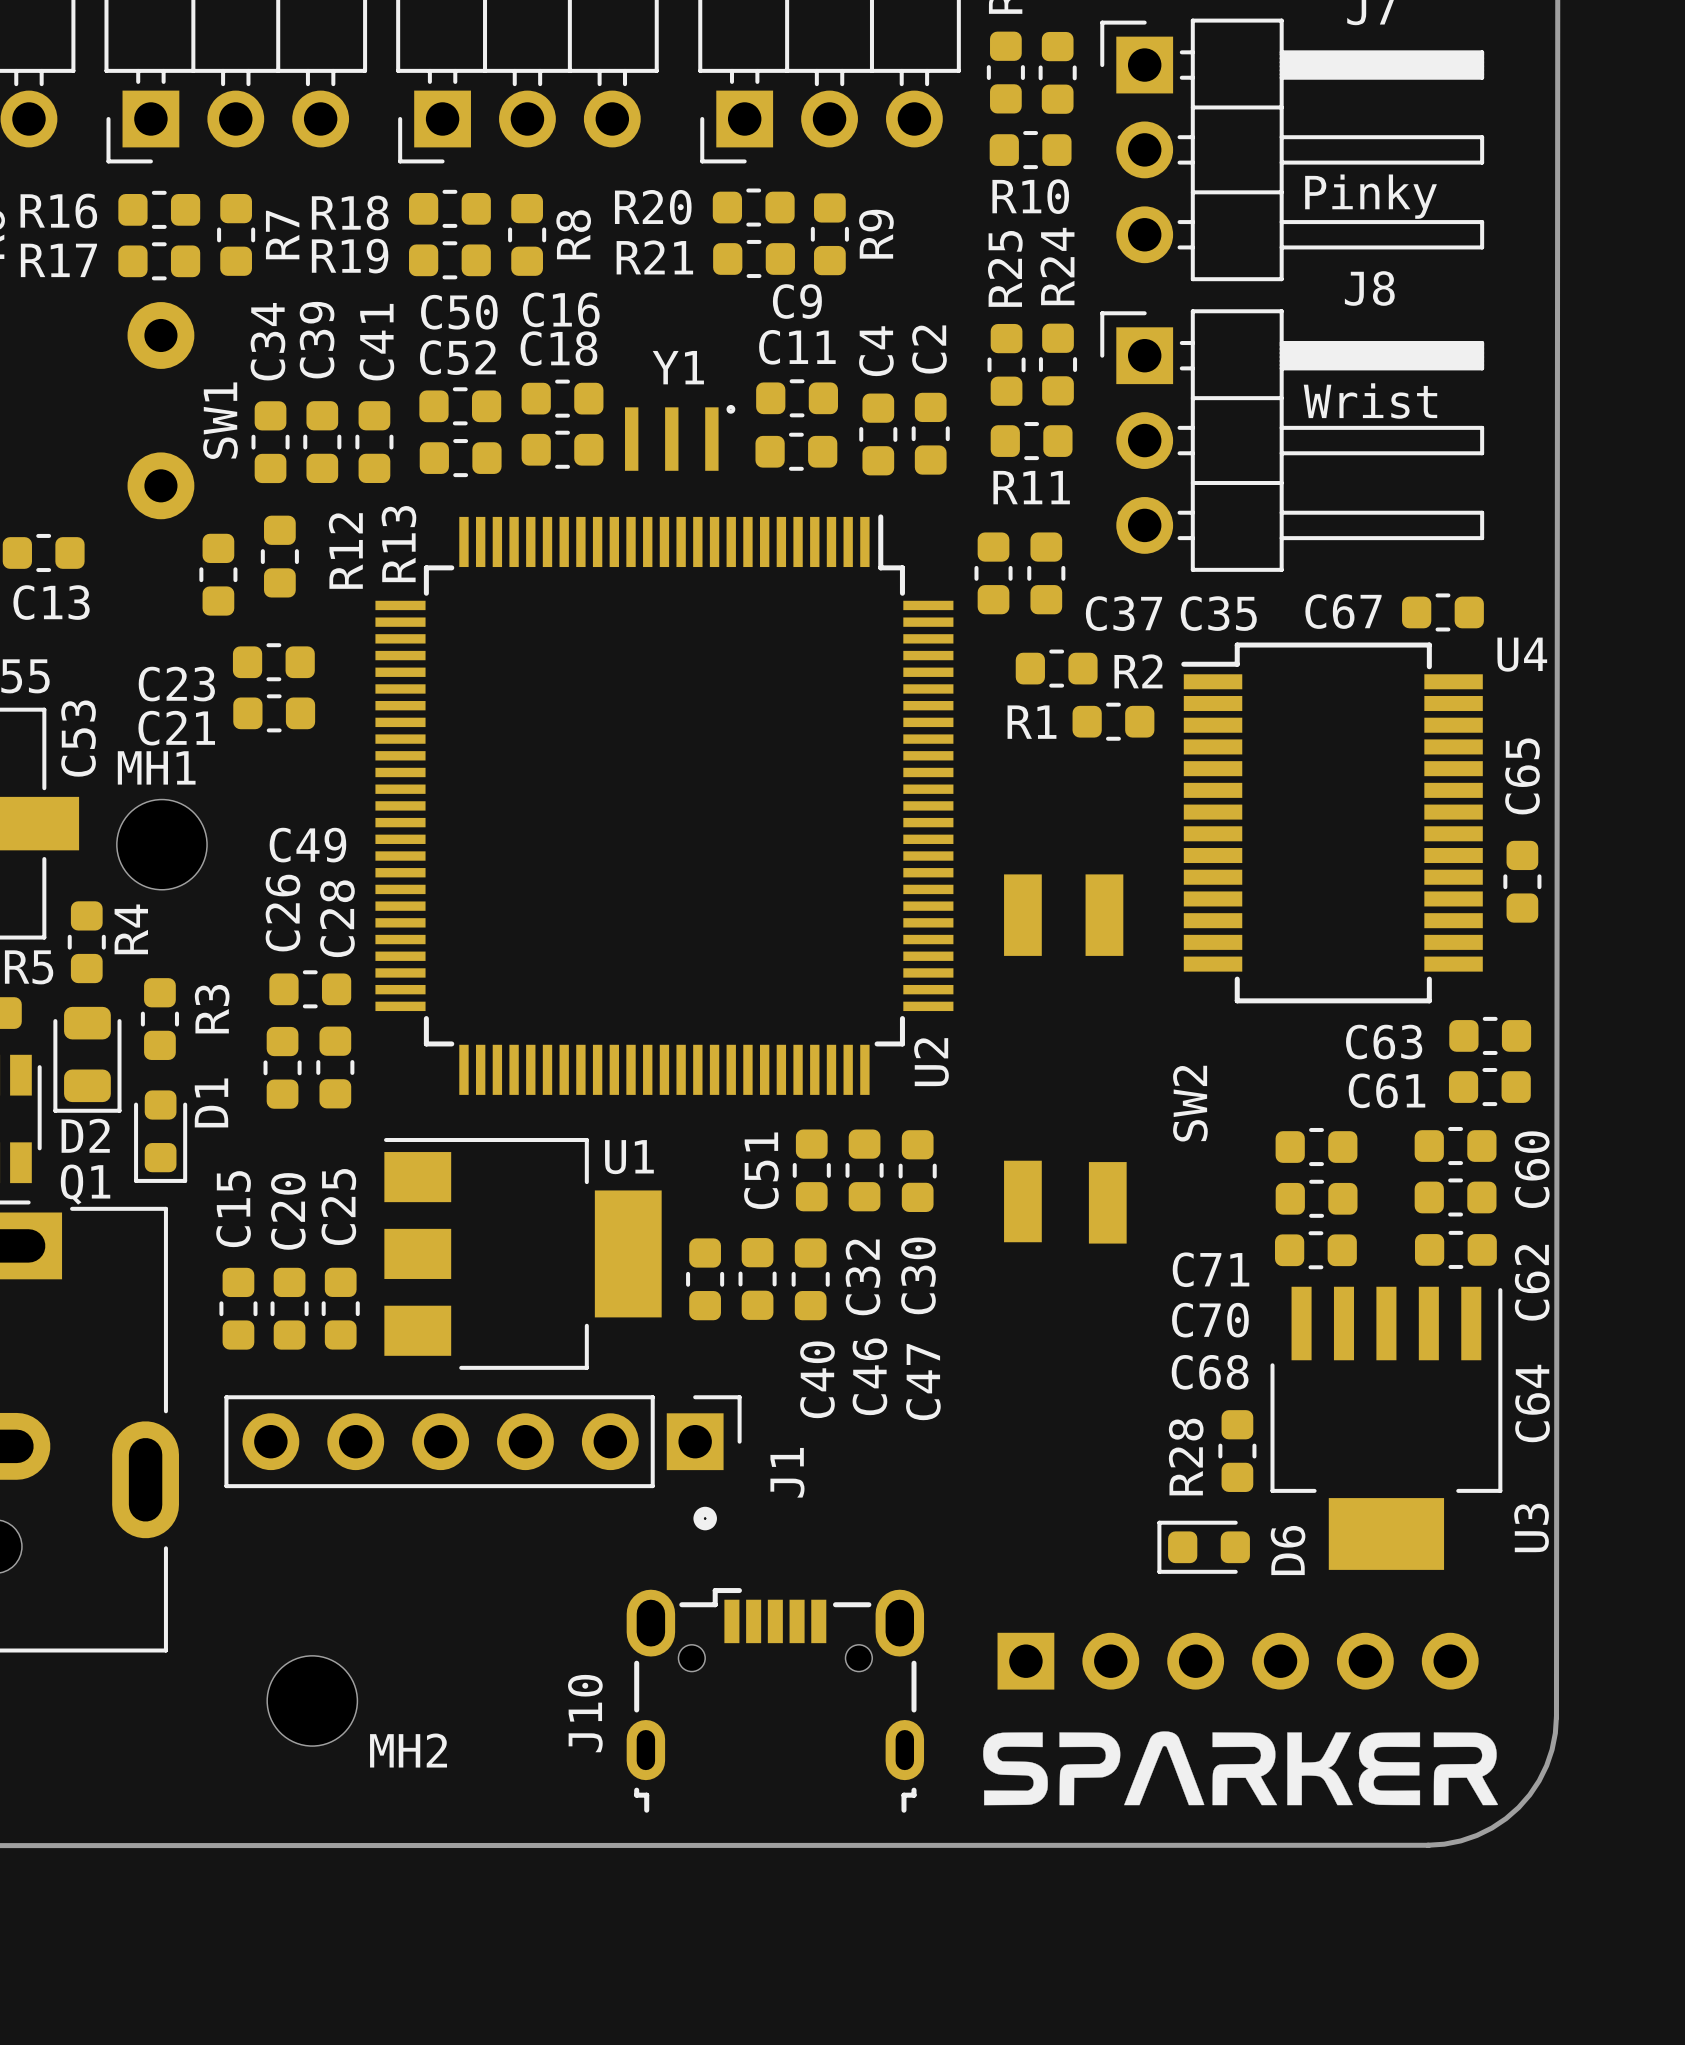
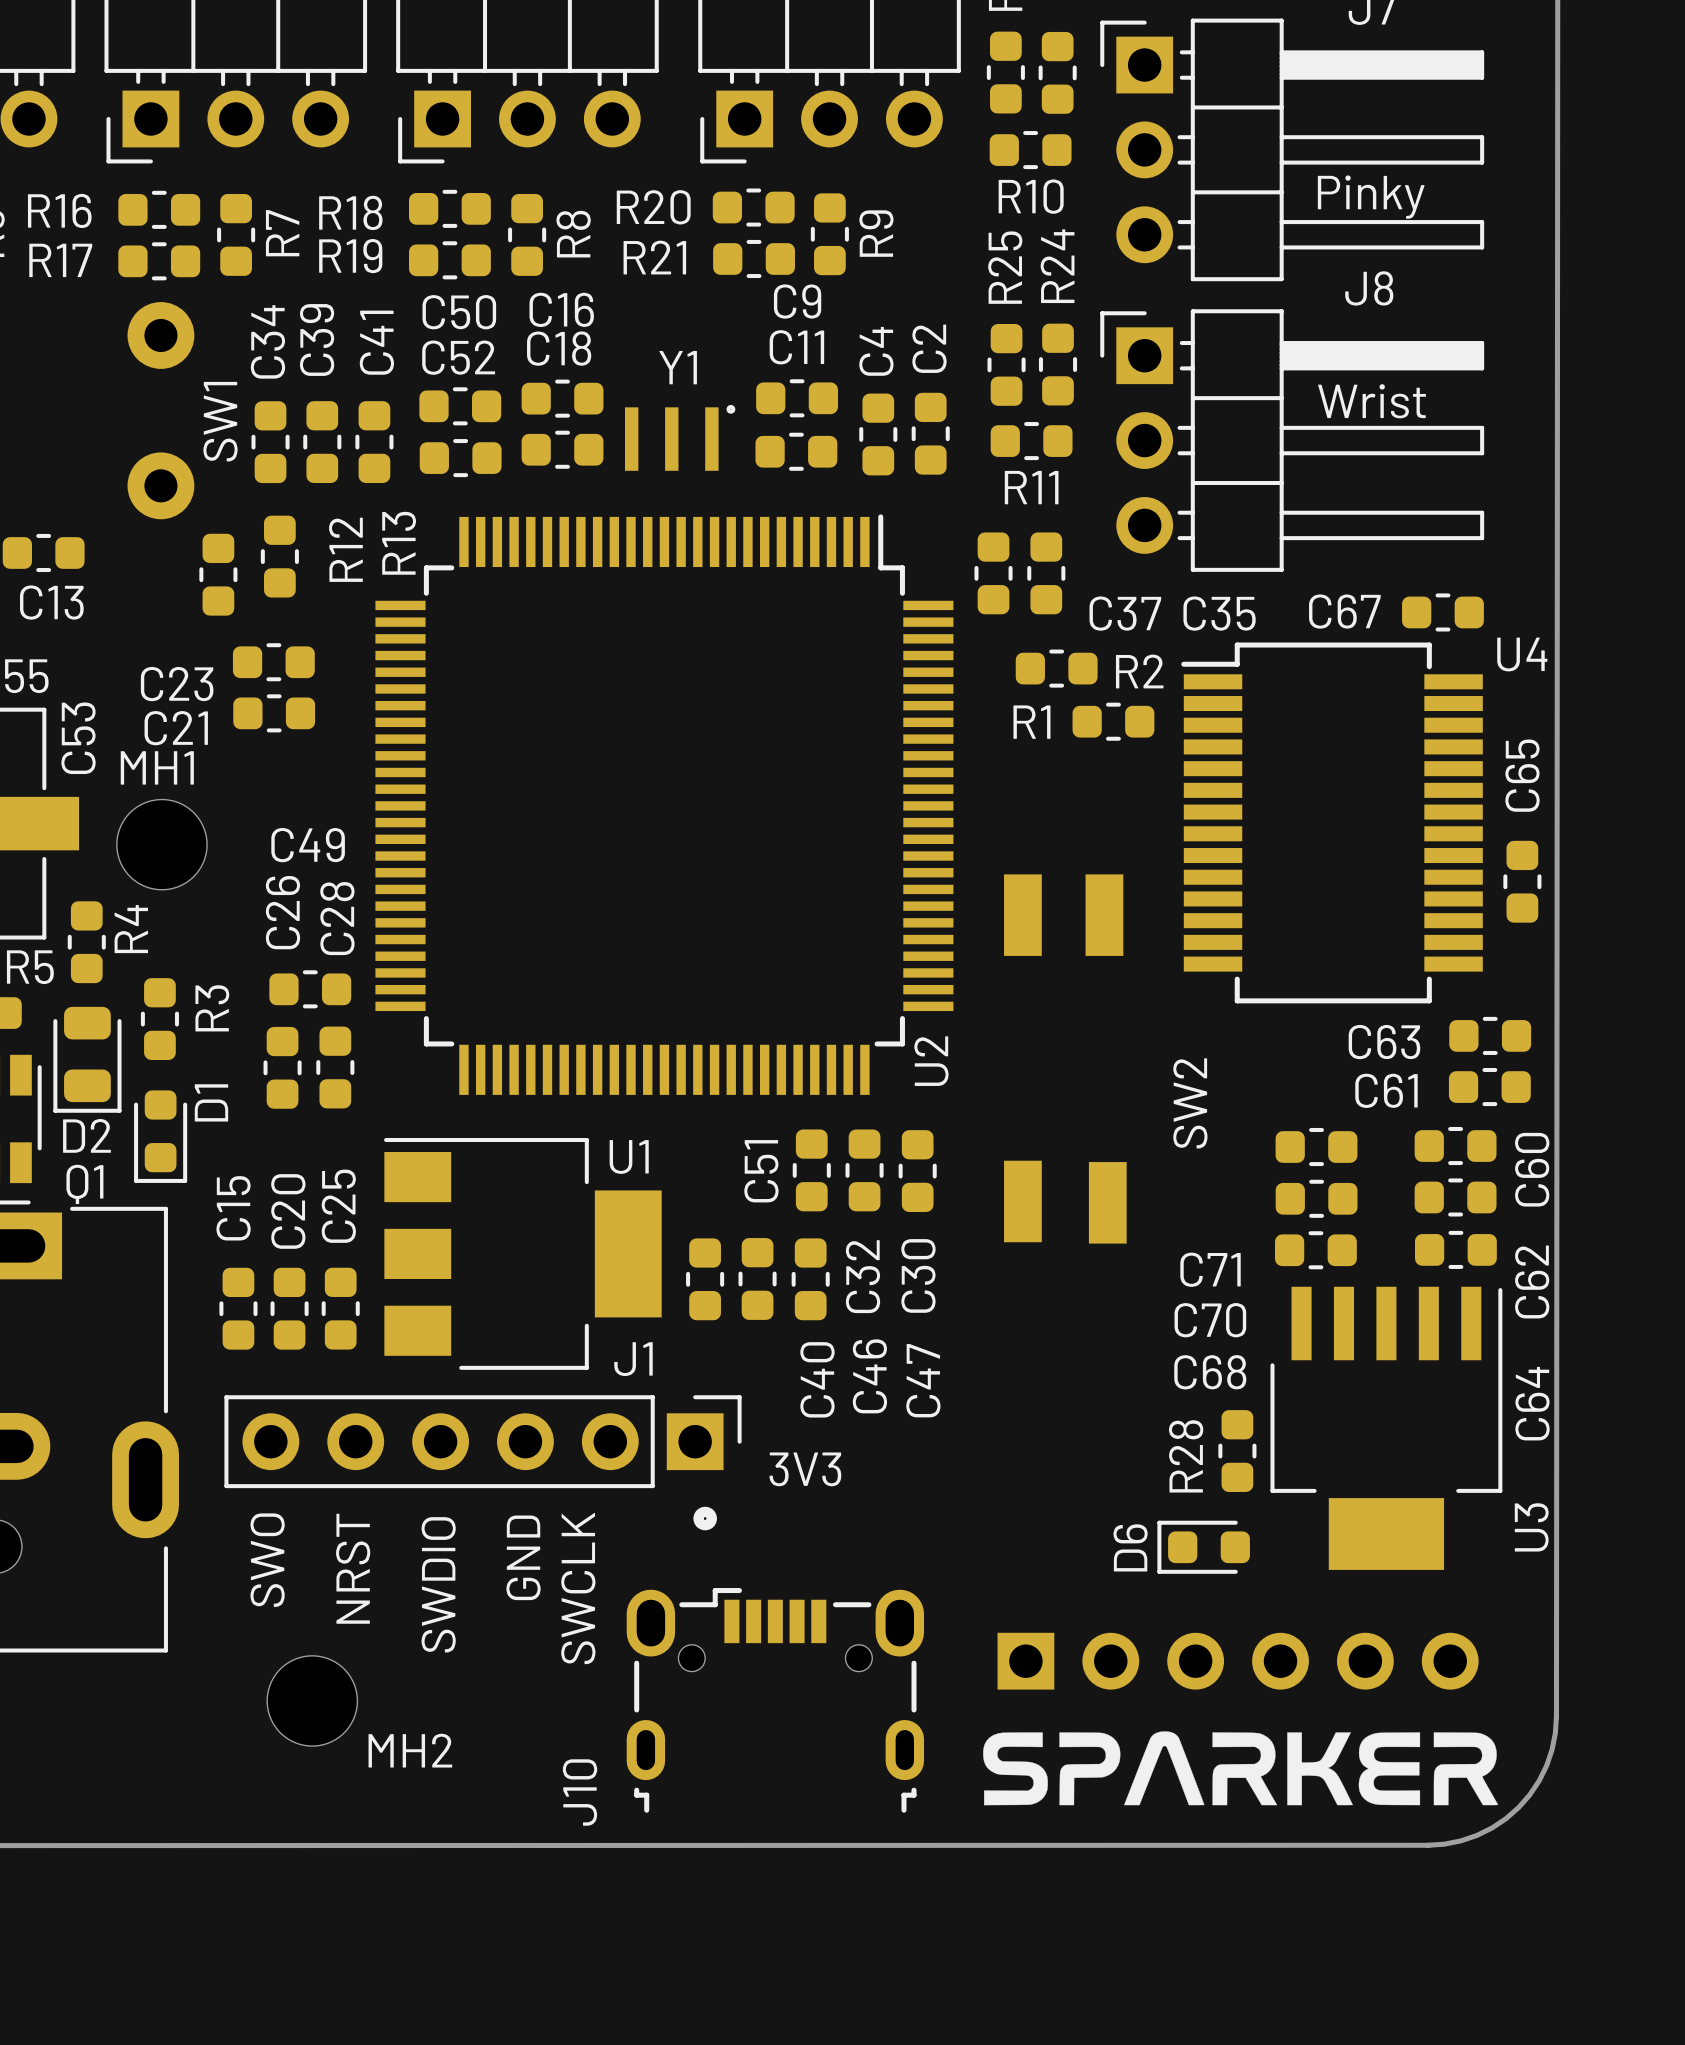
text: none -> 3V3 (805, 1469)
J1 name rotation: 0° (787, 1472) -> 90° clockwise (633, 1359)
J1 name position: J1 (787, 1472) -> J1 (633, 1359)
D6 name position: D6 (1288, 1550) -> D6 (1130, 1547)
text: none -> GND (523, 1557)
text: none -> SWO (267, 1560)
text: none -> NRST (353, 1568)
text: none -> SWDIO (438, 1584)
text: none -> SWCLK (578, 1588)
J10 name position: J10 (585, 1713) -> J10 (580, 1792)

